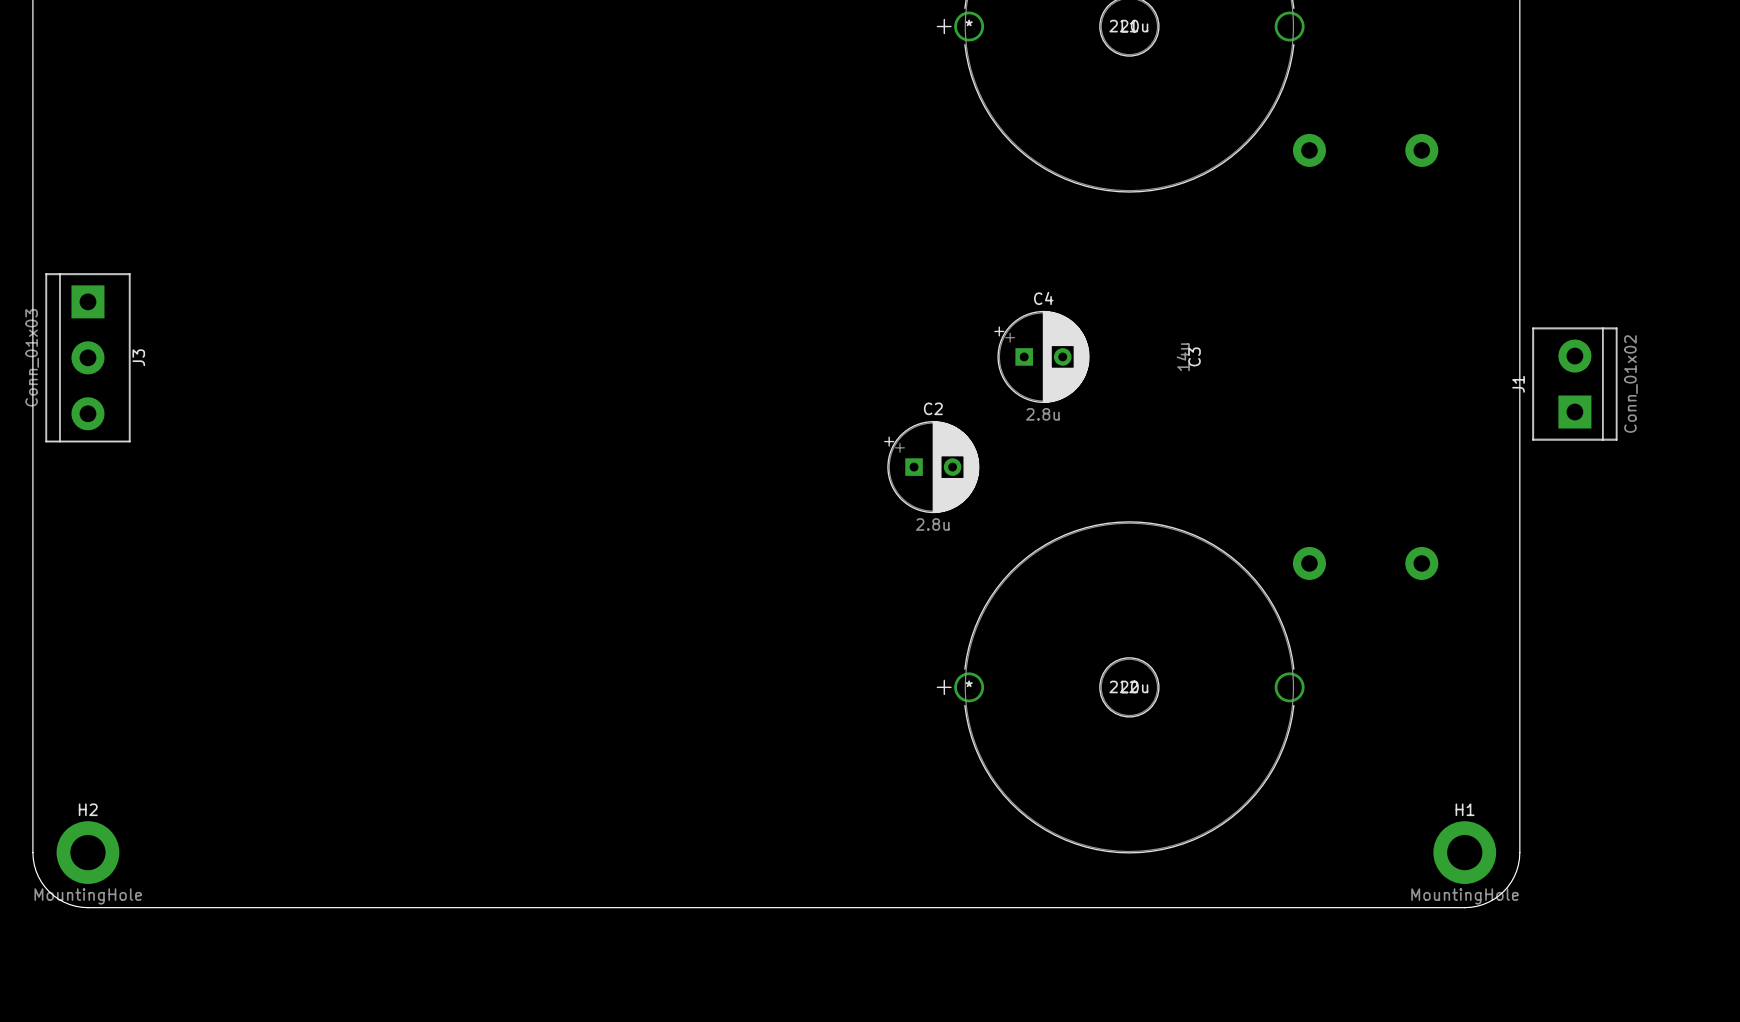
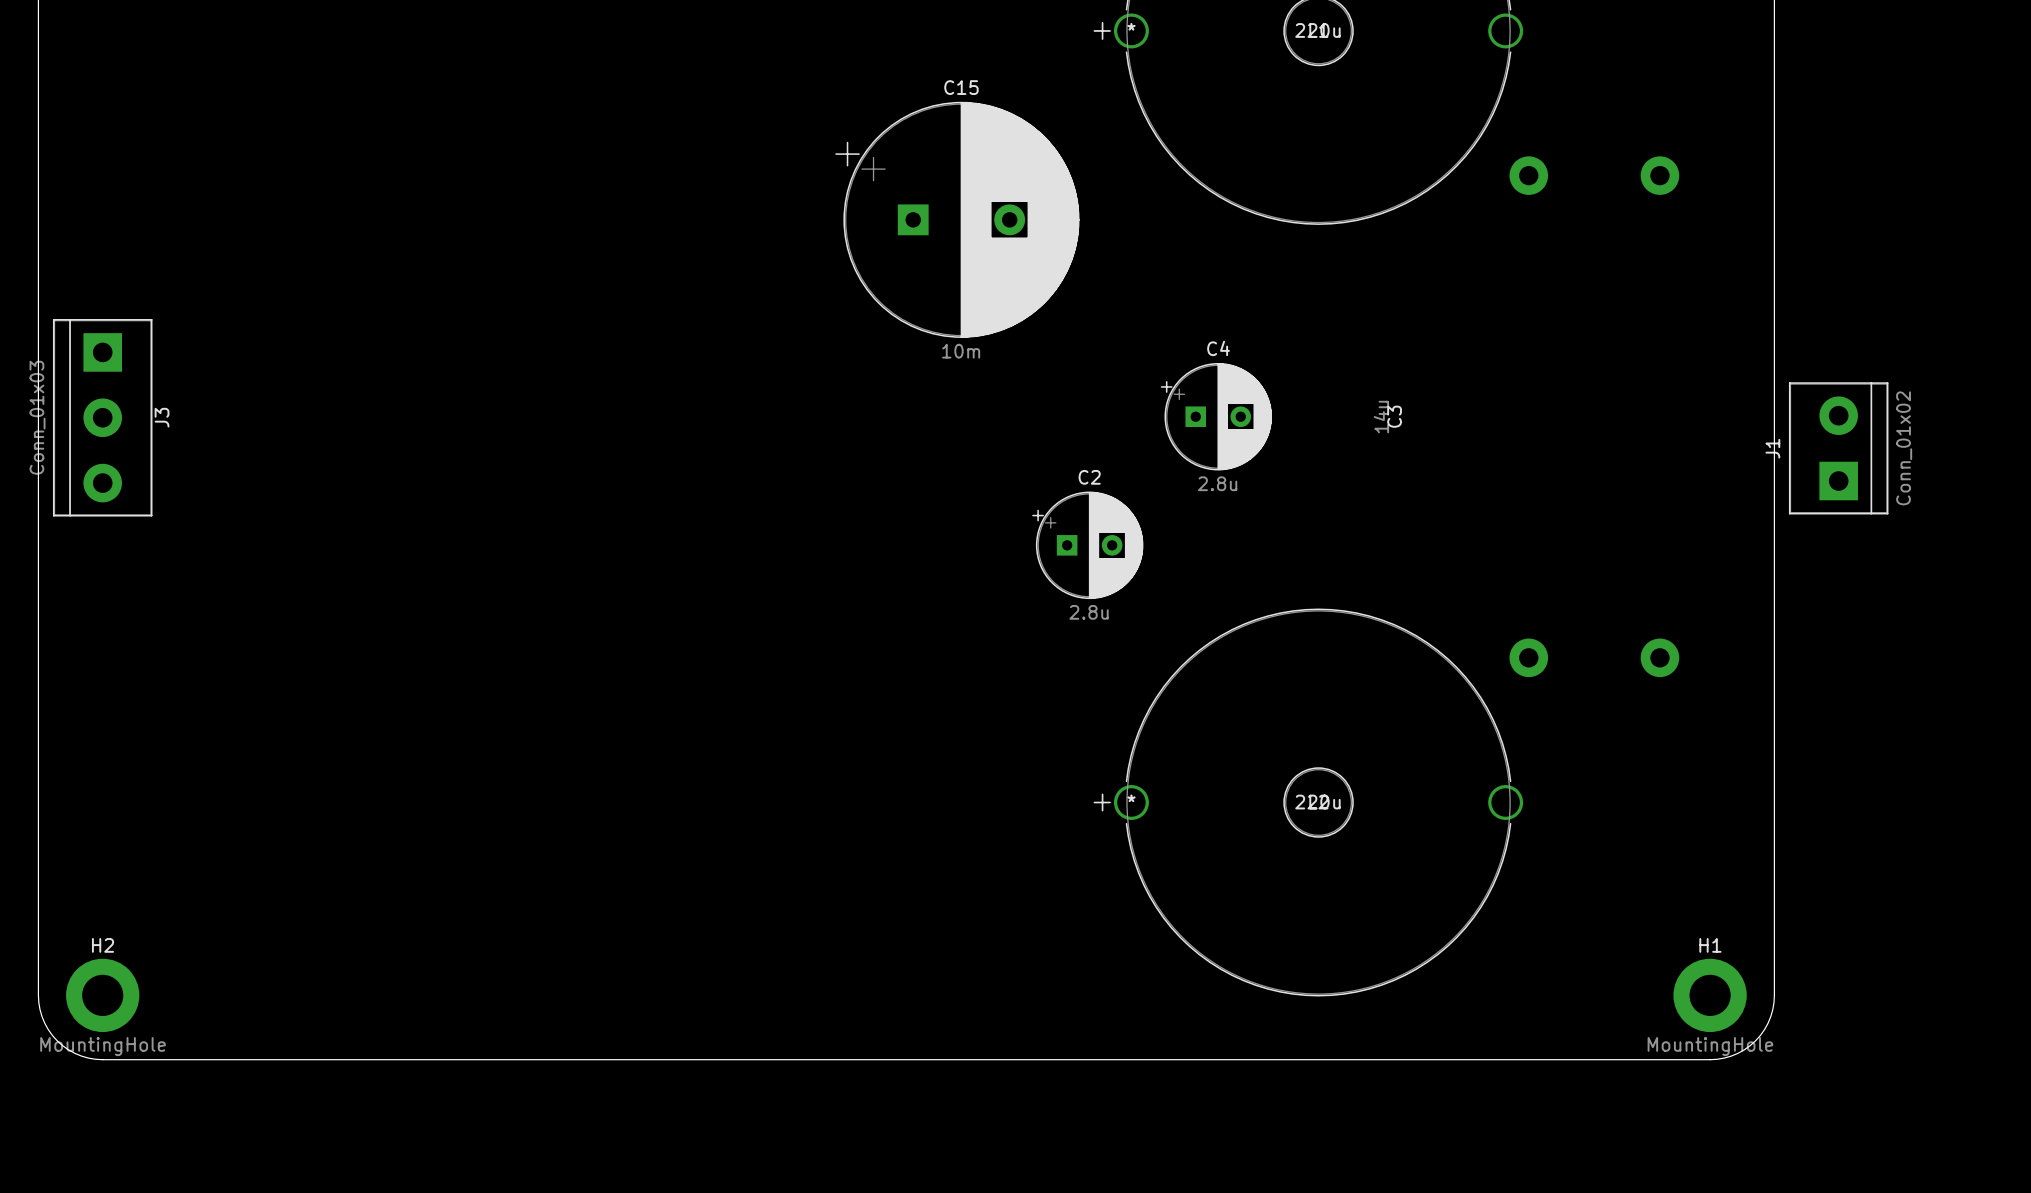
C15: none -> 10m (957, 219)

